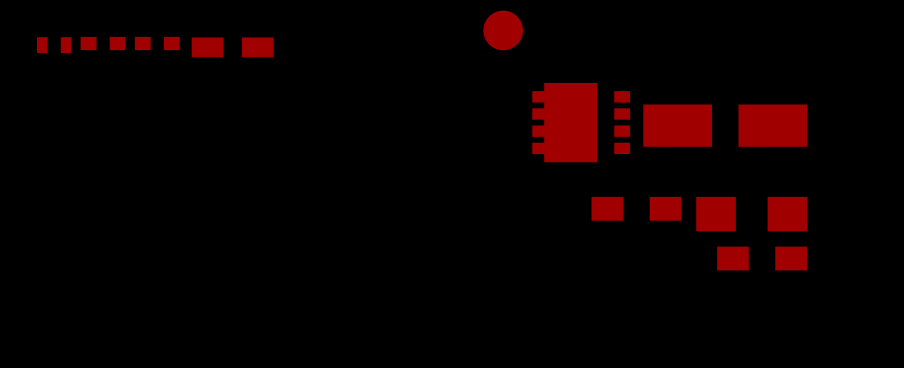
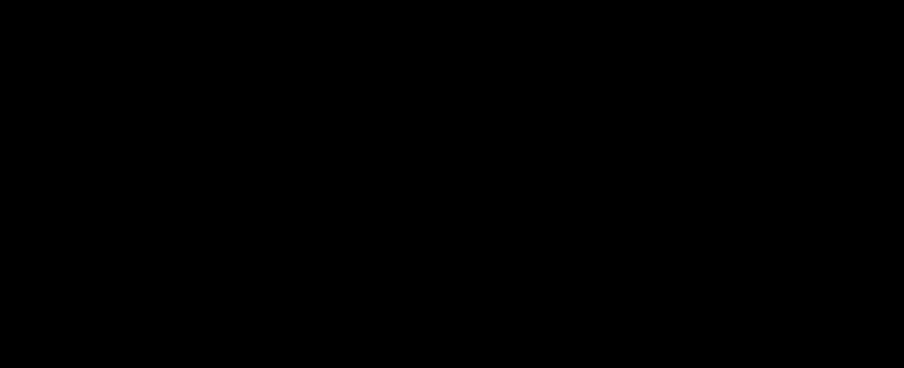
part: (503, 30) -> none
part: (103, 43) -> none
part: (157, 43) -> none
part: (54, 45) -> none
part: (232, 47) -> none
part: (581, 122) -> none
part: (725, 125) -> none
part: (636, 208) -> none
part: (751, 214) -> none
part: (762, 258) -> none

